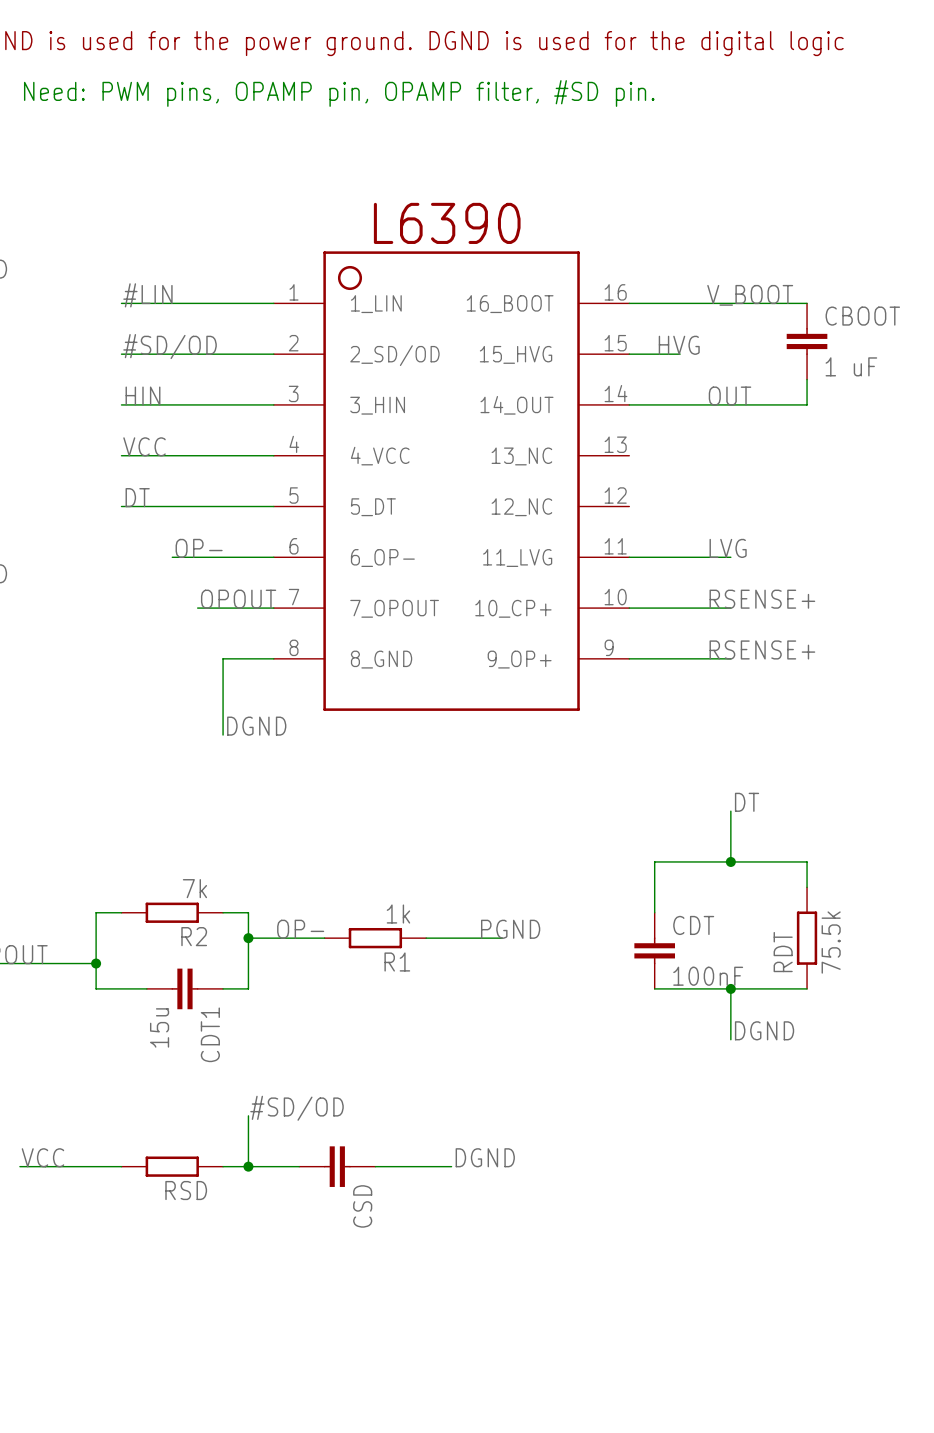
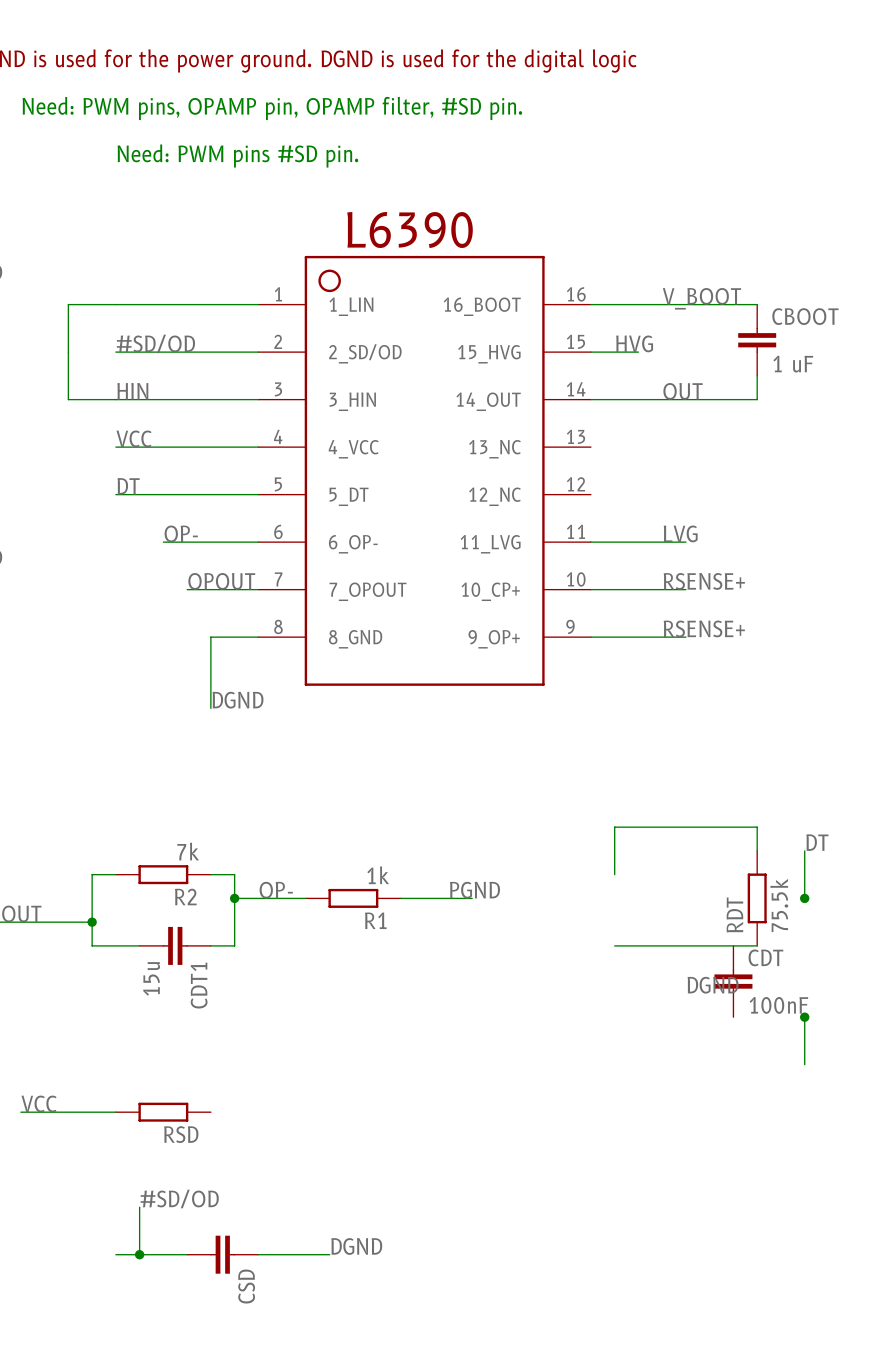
text: none -> Need: PWM pins #SD pin. (237, 155)
label: #LIN (147, 295) -> none
wire: none -> (115, 304) (68, 304) (68, 399) (115, 399)
label position: DT (747, 802) -> DT (817, 842)
wire: (730, 811) (730, 861) -> (804, 850) (804, 898)
junction: (730, 861) -> none
junction: none -> (804, 898)
CDT position: (654, 950) -> (733, 981)
wire: (730, 988) (730, 1039) -> (804, 1017) (804, 1064)
junction: (730, 988) -> none
junction: none -> (804, 1017)
label position: #SD/OD (296, 1108) -> #SD/OD (179, 1198)
wire: (248, 1115) (248, 1166) -> (139, 1207) (139, 1254)
label position: DGND (485, 1157) -> DGND (356, 1246)
wire: (223, 1166) (299, 1166) -> (115, 1254) (187, 1254)
junction: (248, 1166) -> none
CSD position: (337, 1166) -> (222, 1254)
wire: (375, 1166) (451, 1166) -> (258, 1254) (329, 1254)
junction: none -> (139, 1254)

